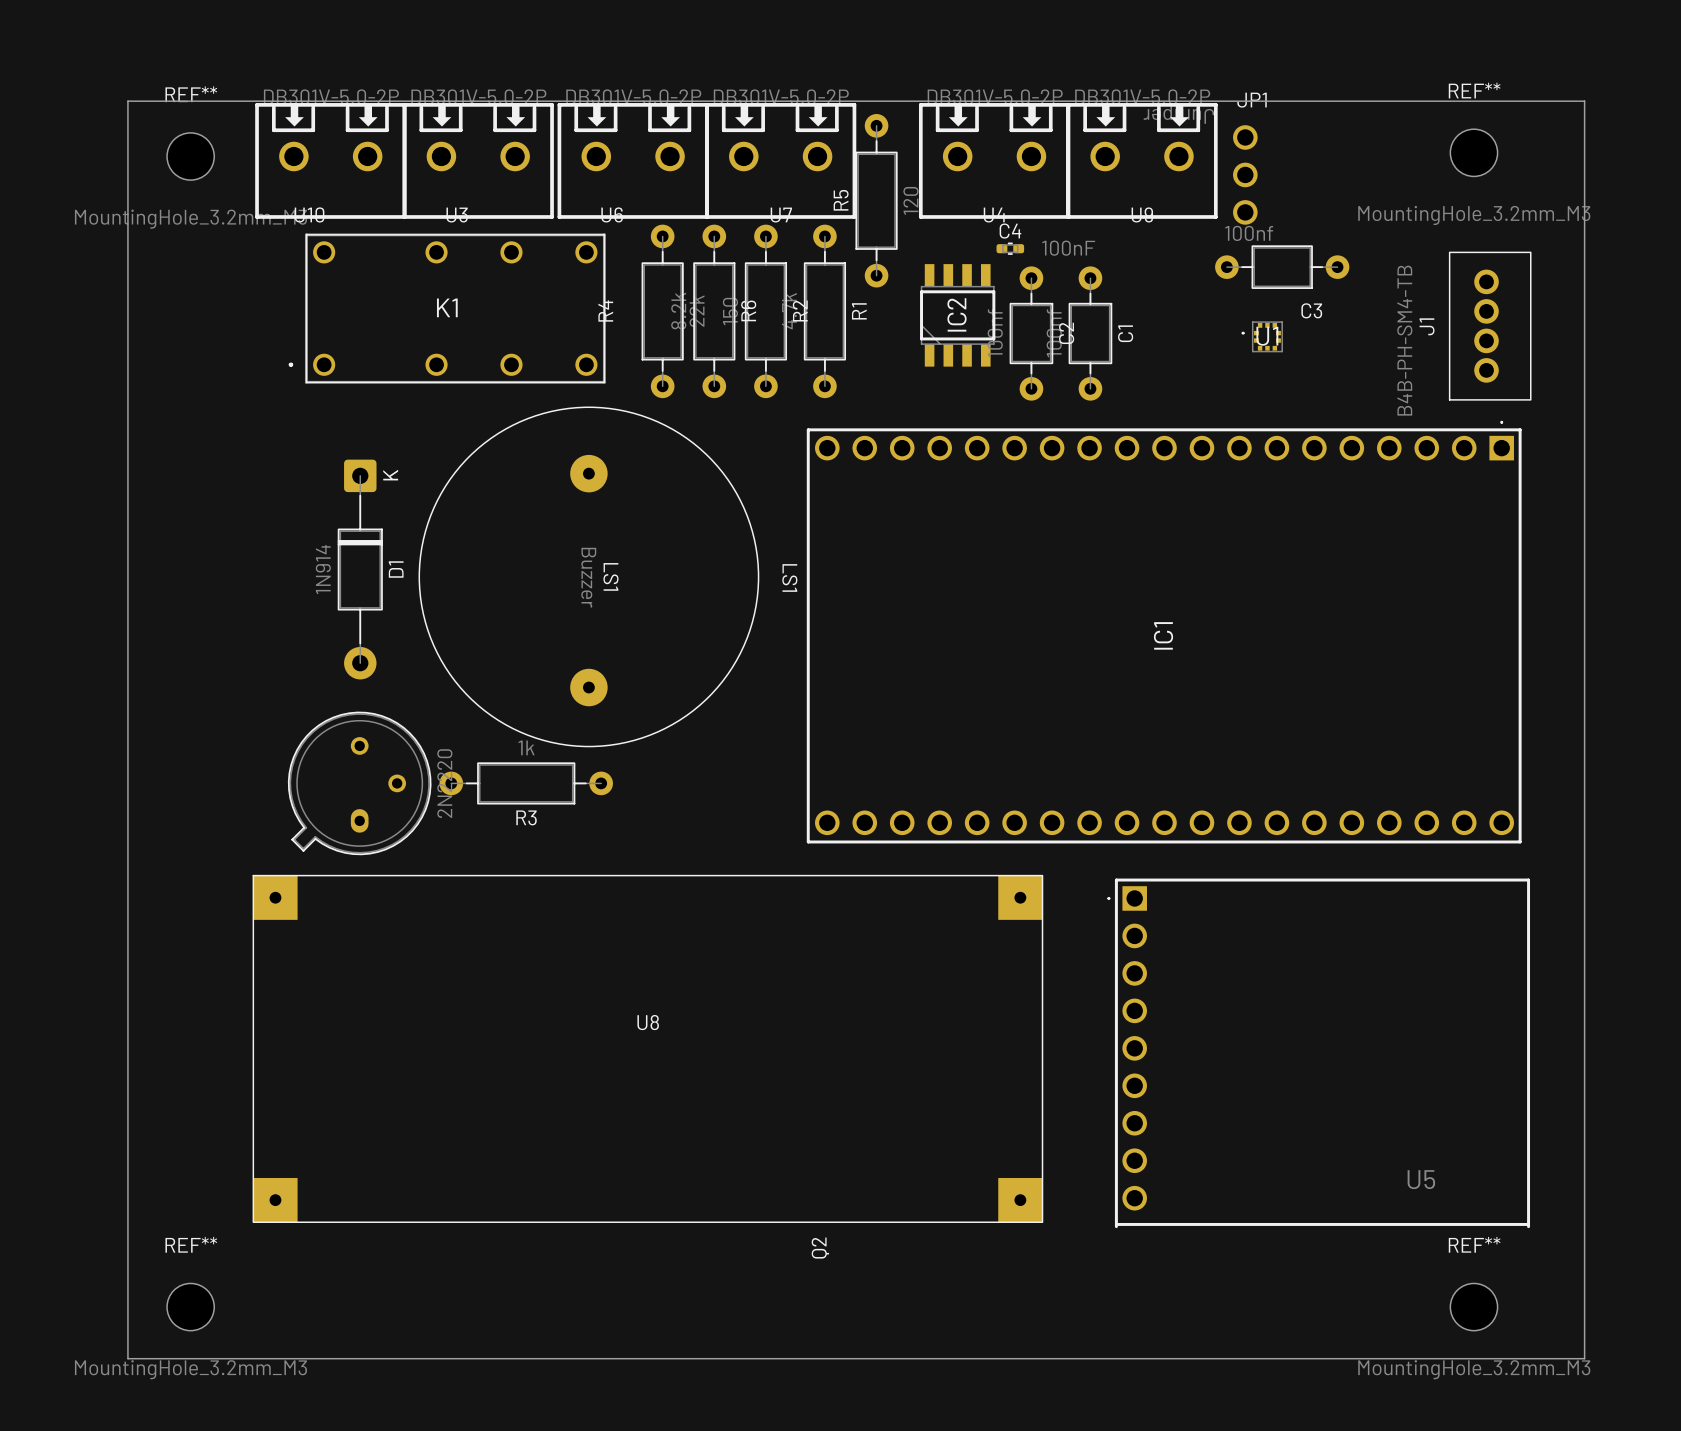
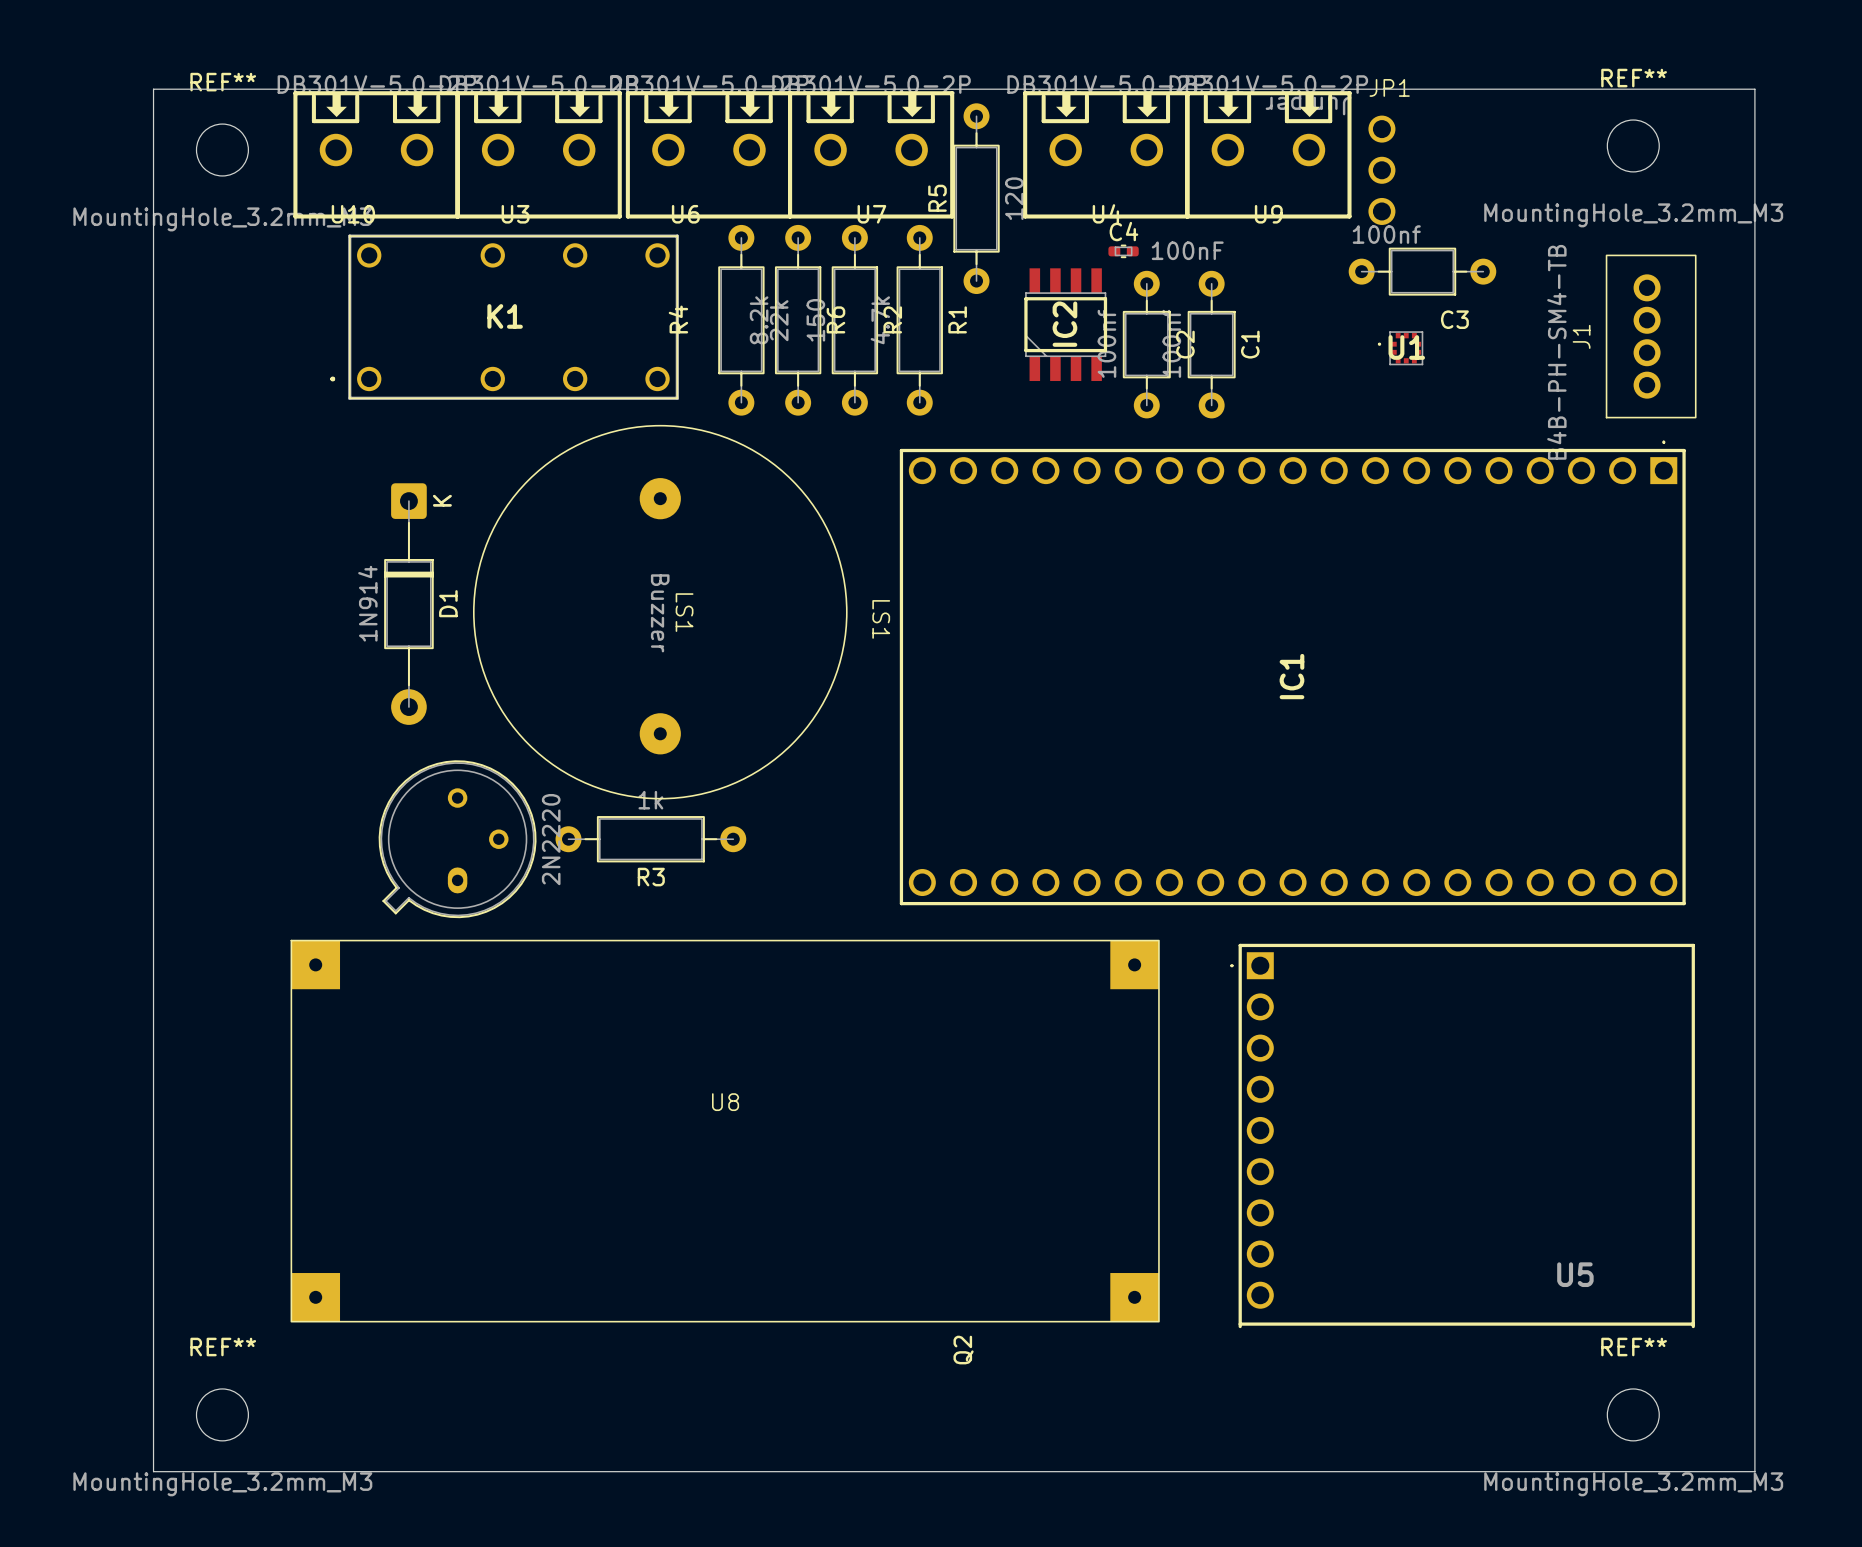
Q2 position: (359, 783) -> (457, 839)
R3 position: (526, 783) -> (650, 839)

